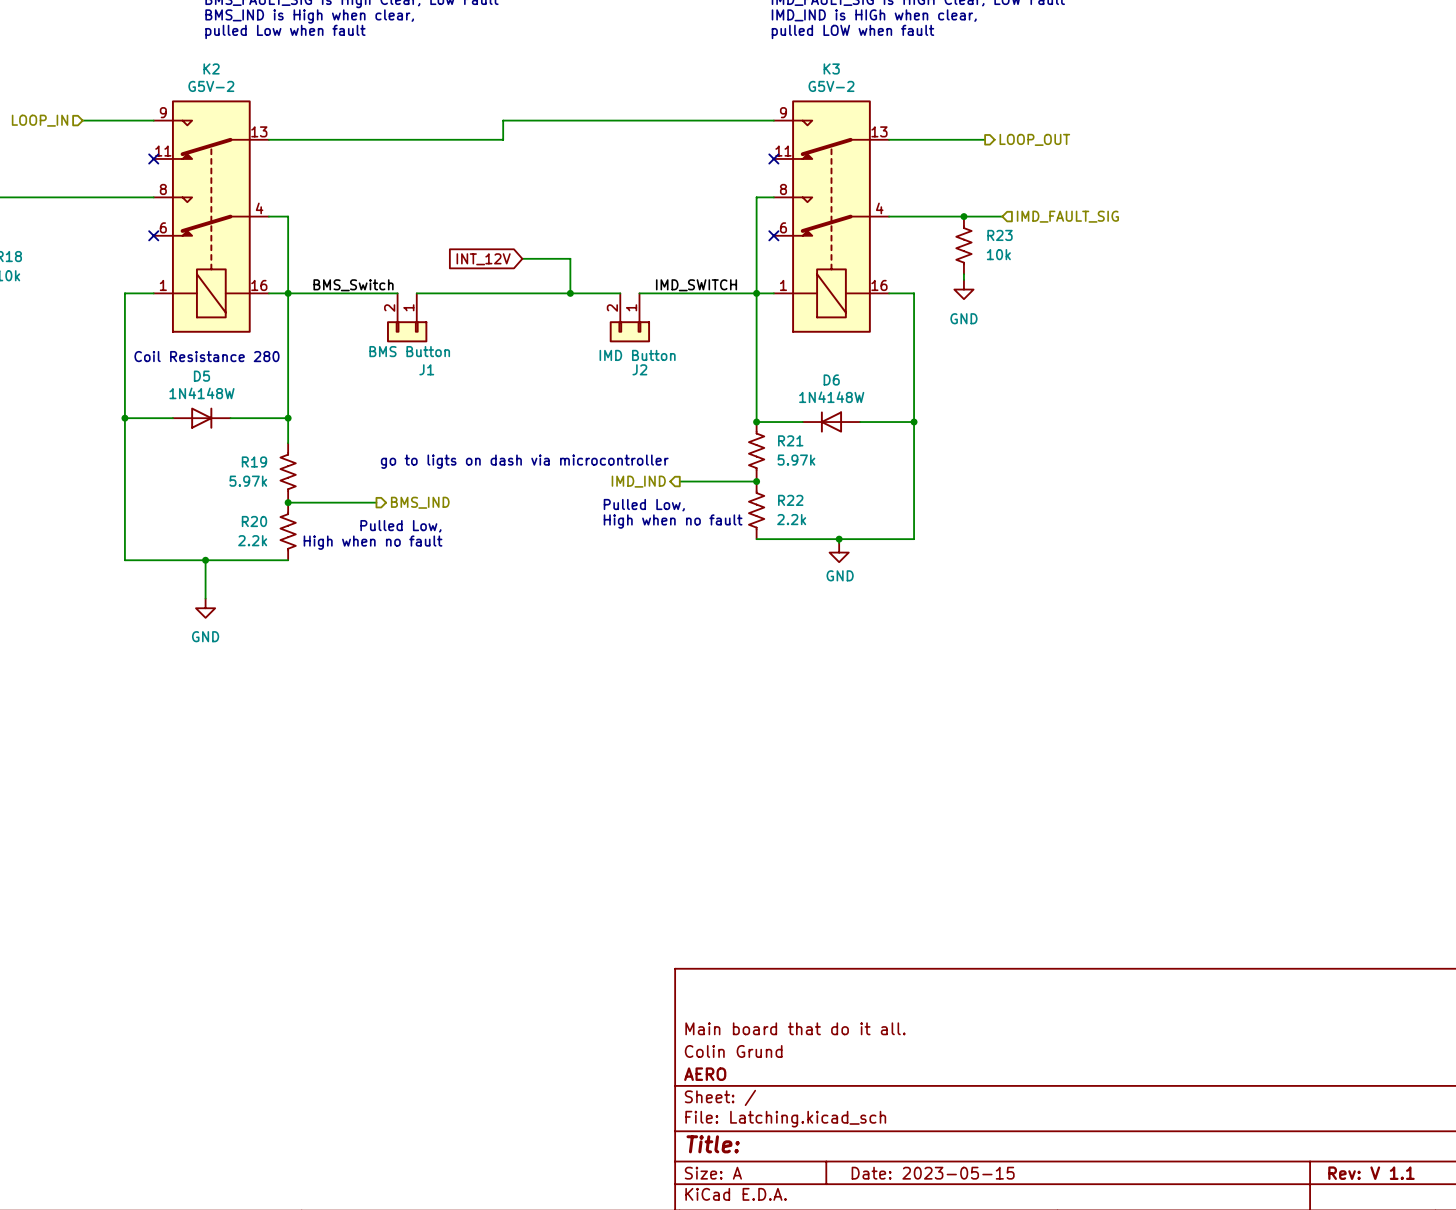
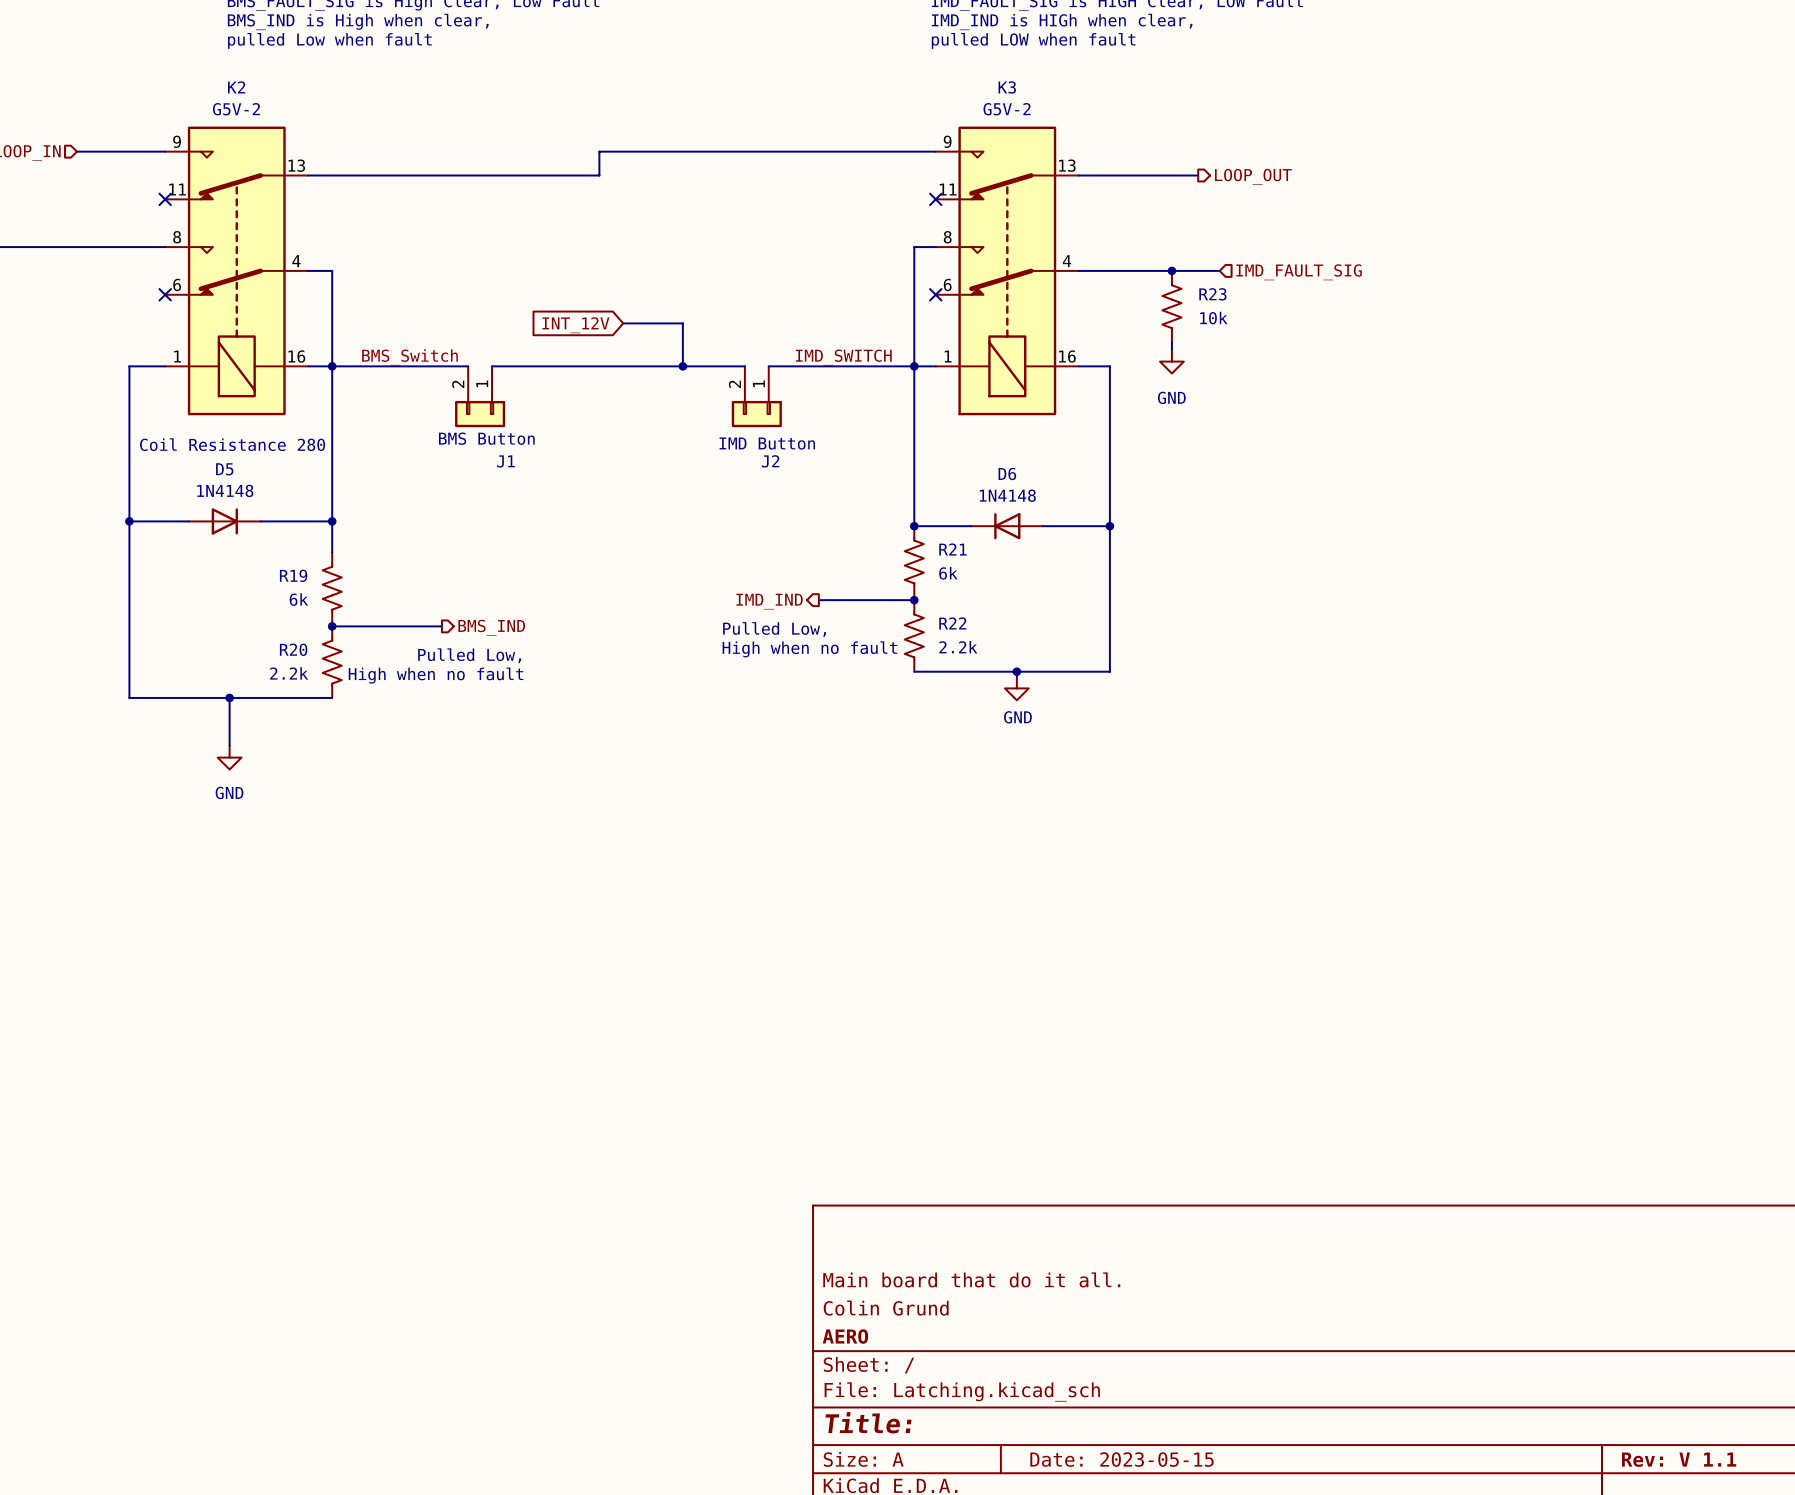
D5 value: 1N4148W (201, 393) -> 1N4148 (225, 490)
D6 value: 1N4148W (831, 397) -> 1N4148 (1007, 495)
R21 value: 5.97k (796, 460) -> 6k (948, 573)
text: go to ligts on dash via microcontroller (524, 461) -> none
R19 value: 5.97k (248, 481) -> 6k (298, 599)

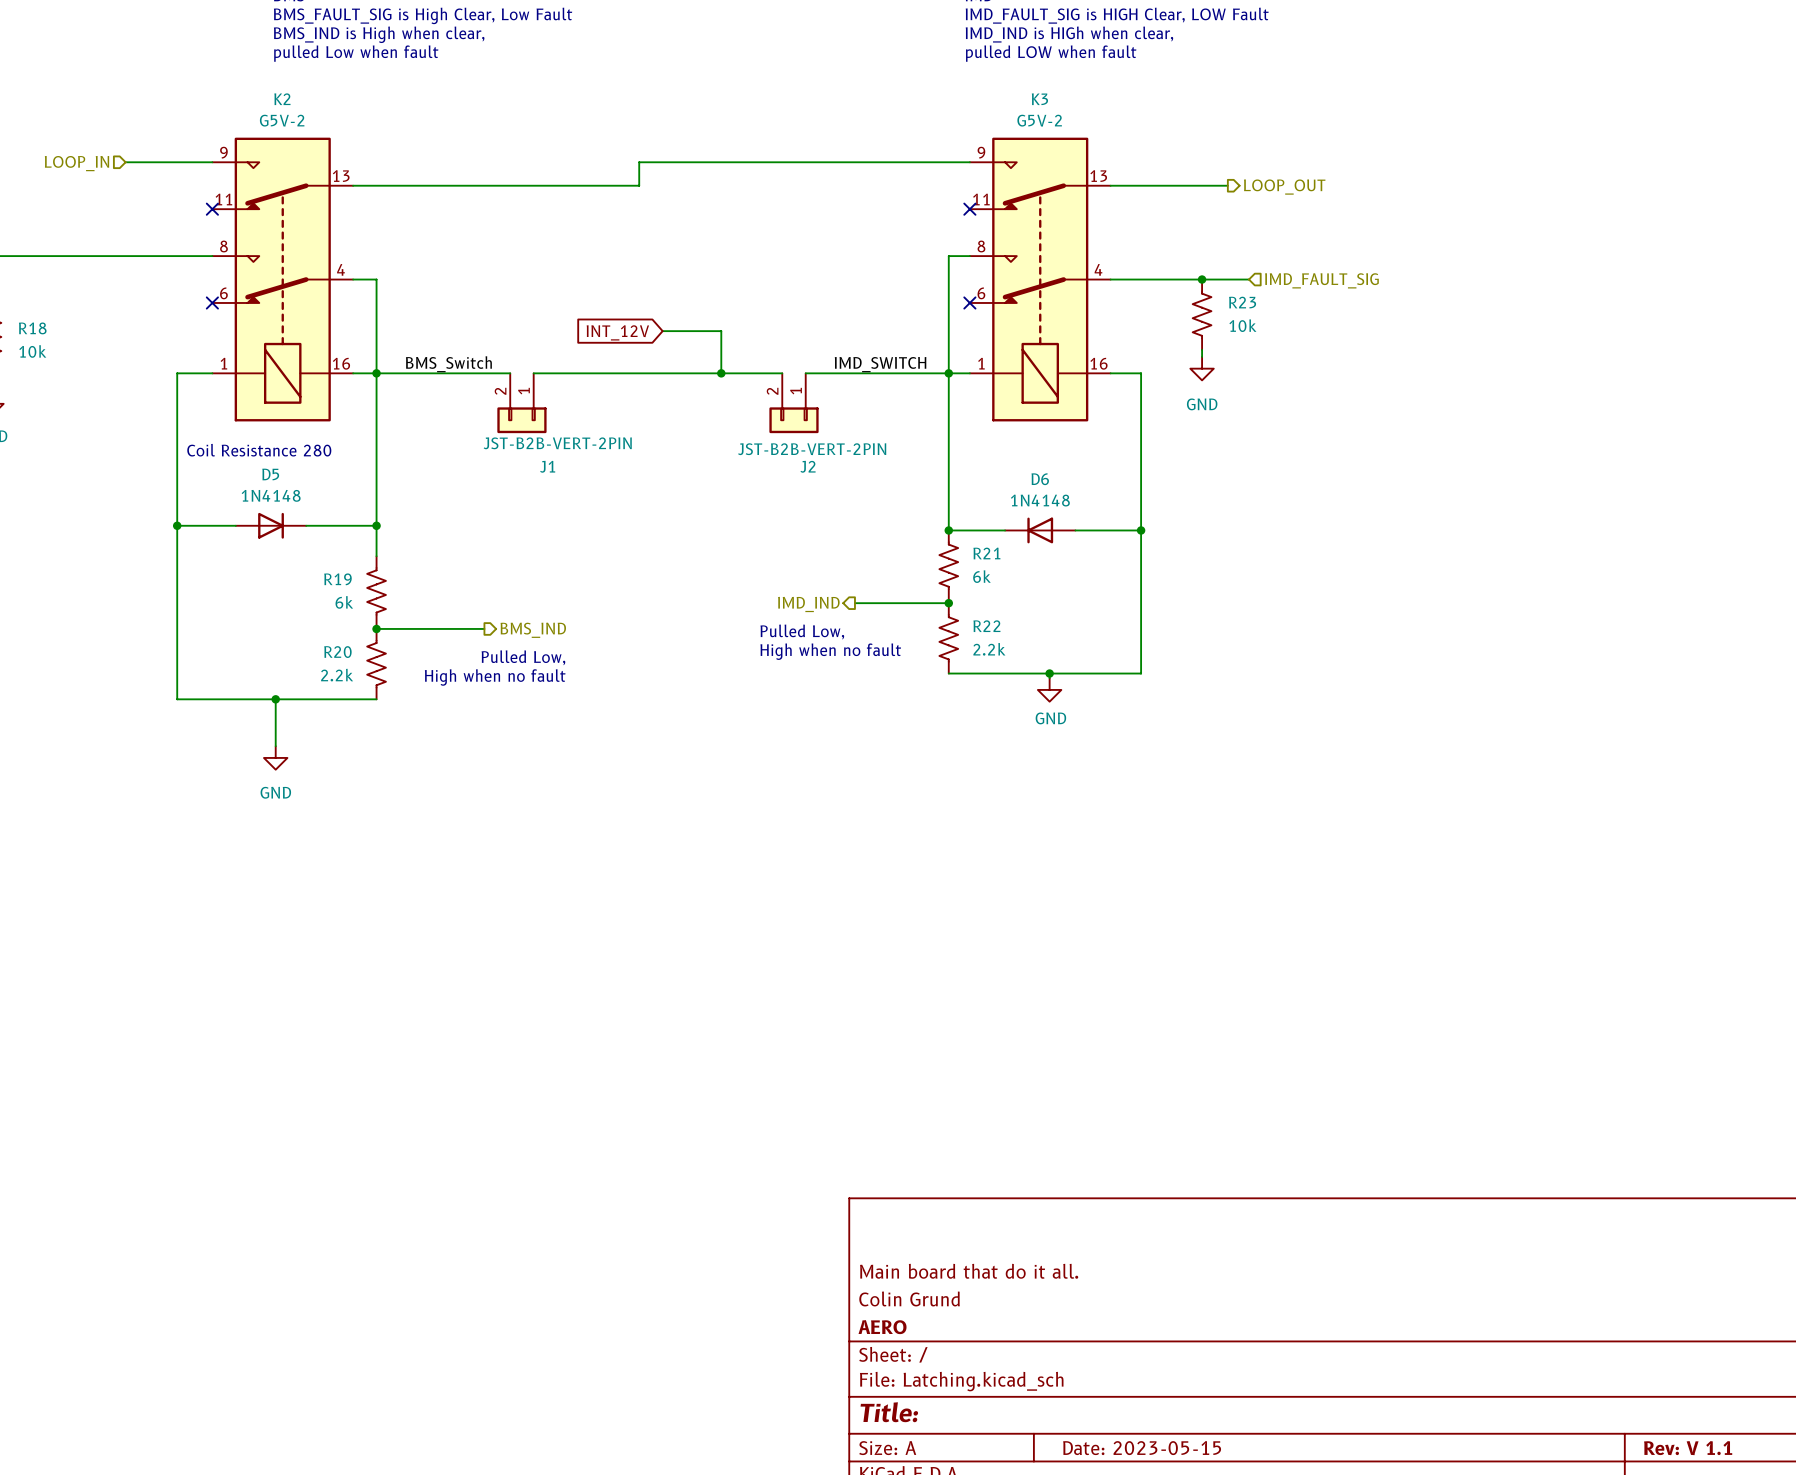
J1 value: BMS Button (486, 438) -> JST-B2B-VERT-2PIN (557, 443)
J2 value: IMD Button (767, 443) -> JST-B2B-VERT-2PIN (812, 449)

